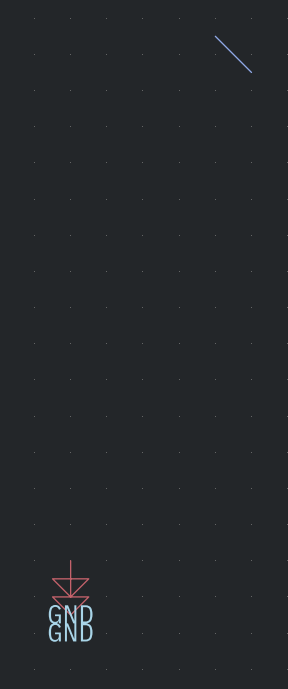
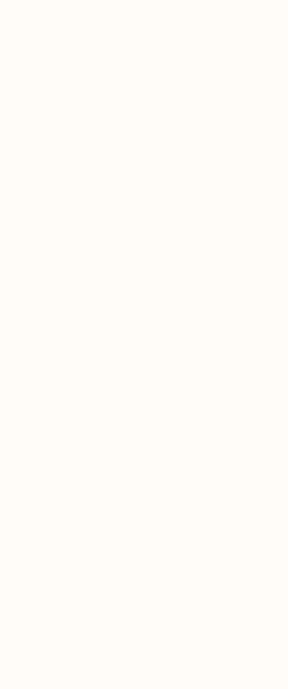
bus: (215, 36) (251, 72) -> none
power symbol: GND (70, 578) -> none
power symbol: GND (70, 596) -> none

